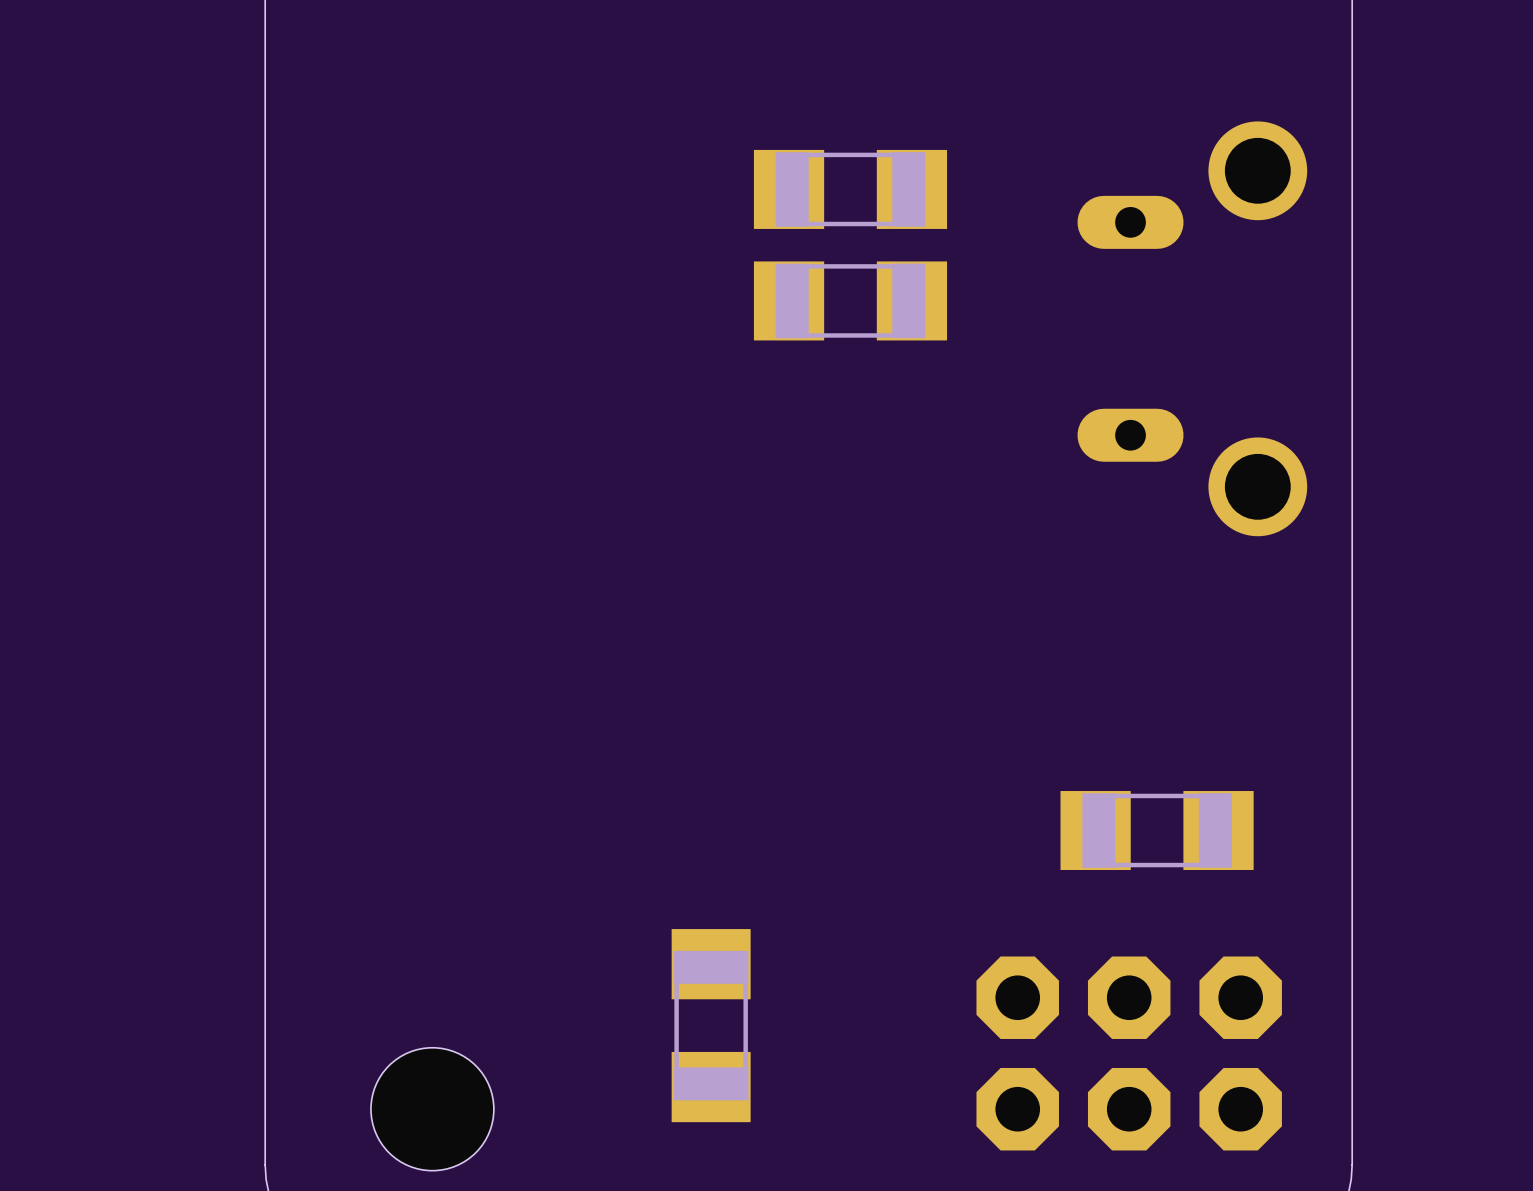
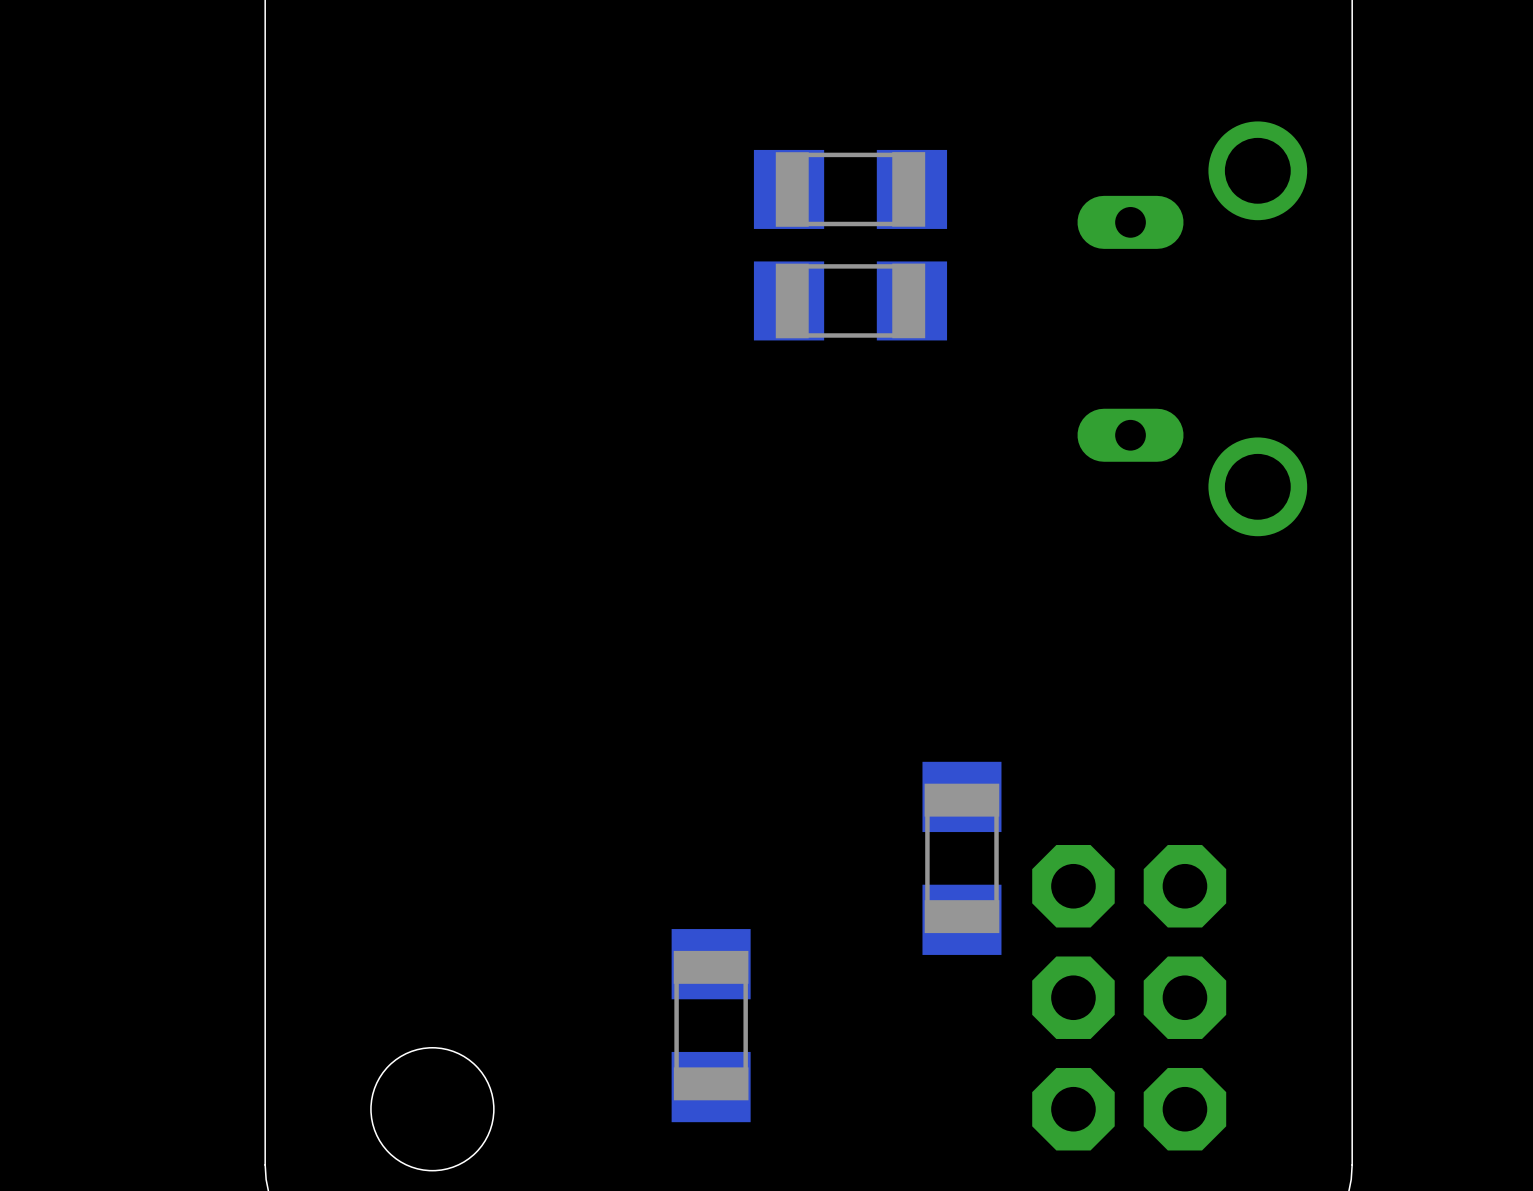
part rotation: 0° (1157, 830) -> 90° clockwise (961, 858)
part position: (1157, 830) -> (961, 858)
part rotation: 0° (1129, 1053) -> 90° clockwise (1129, 997)

